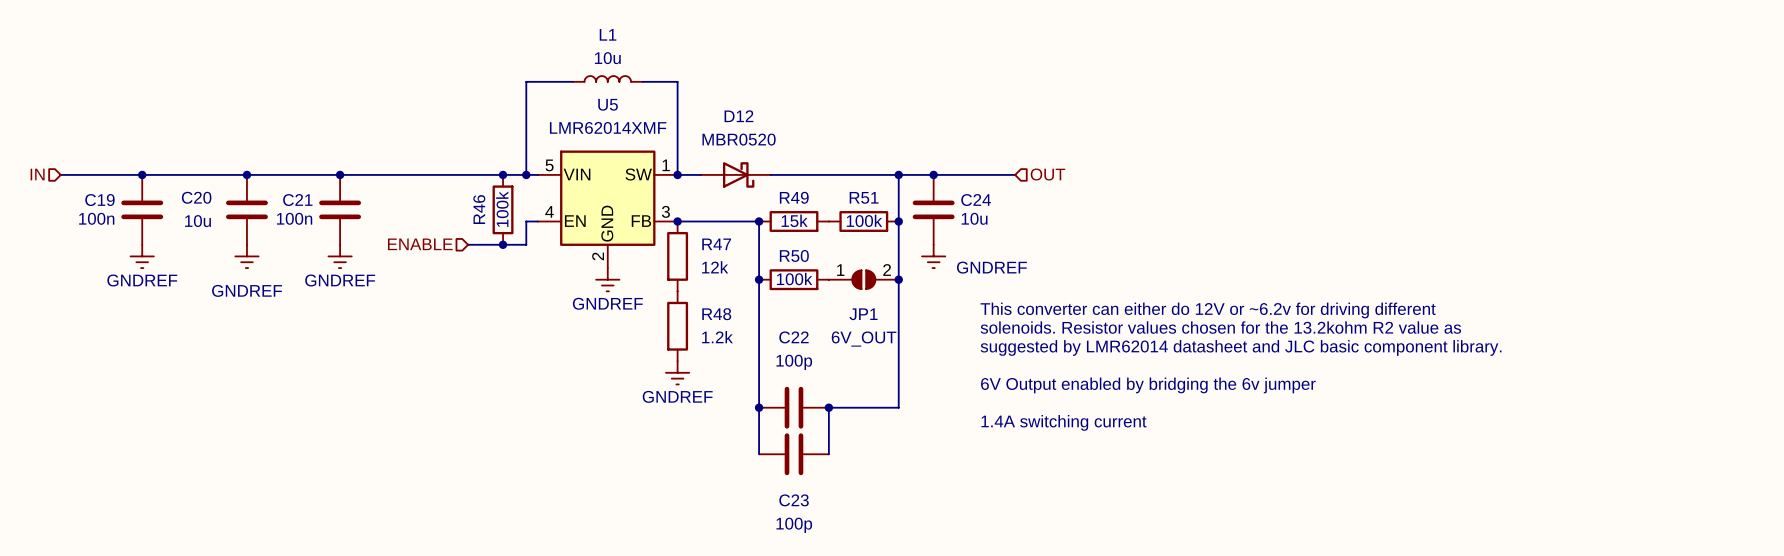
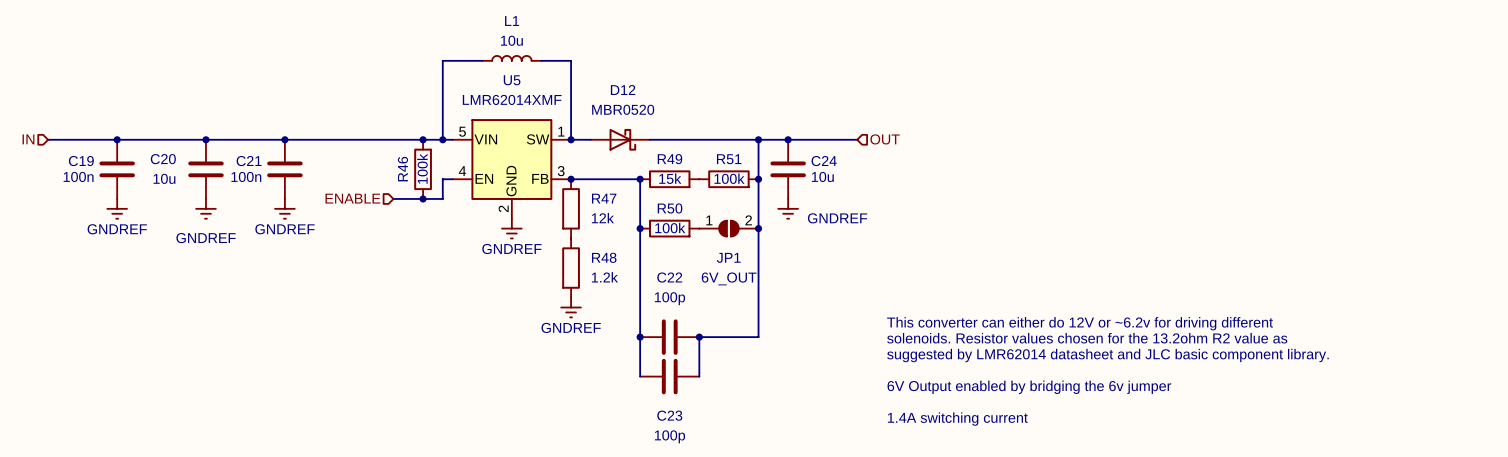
text position: This converter can either do 12V or ~6.2v for driving different (1208, 310) -> This converter can either do 12V or ~6.2v for driving different (1080, 323)
text: solenoids. Resistor values chosen for the 13.2kohm R2 value as (1220, 327) -> none
text position: suggested by LMR62014 datasheet and JLC basic component library. (1241, 347) -> suggested by LMR62014 datasheet and JLC basic component library. (1107, 355)
text position: 6V Output enabled by bridging the 6v jumper (1148, 385) -> 6V Output enabled by bridging the 6v jumper (1029, 387)
text: none -> solenoids. Resistor values chosen for the 13.2ohm R2 value as (1087, 338)
text position: 1.4A switching current (1063, 422) -> 1.4A switching current (957, 419)

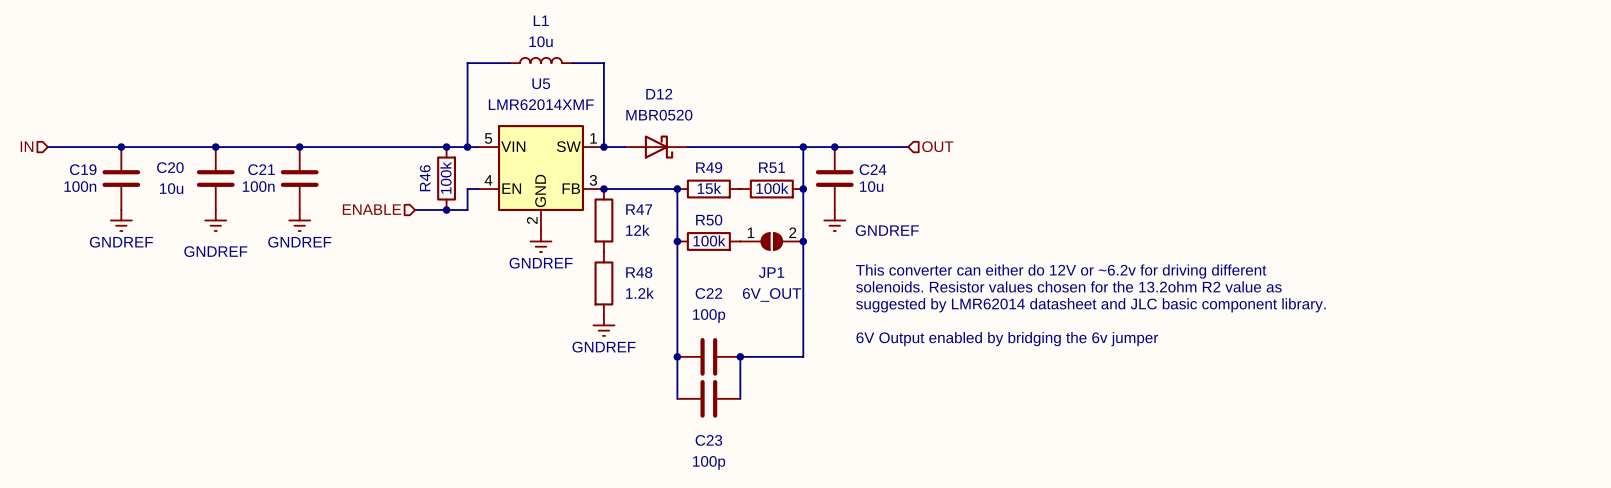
text position: This converter can either do 12V or ~6.2v for driving different (1080, 323) -> This converter can either do 12V or ~6.2v for driving different (1061, 271)
text position: solenoids. Resistor values chosen for the 13.2ohm R2 value as (1087, 338) -> solenoids. Resistor values chosen for the 13.2ohm R2 value as (1068, 286)
text position: suggested by LMR62014 datasheet and JLC basic component library. (1107, 355) -> suggested by LMR62014 datasheet and JLC basic component library. (1090, 305)
text position: 6V Output enabled by bridging the 6v jumper (1029, 387) -> 6V Output enabled by bridging the 6v jumper (1007, 339)
text: 1.4A switching current (957, 419) -> none

